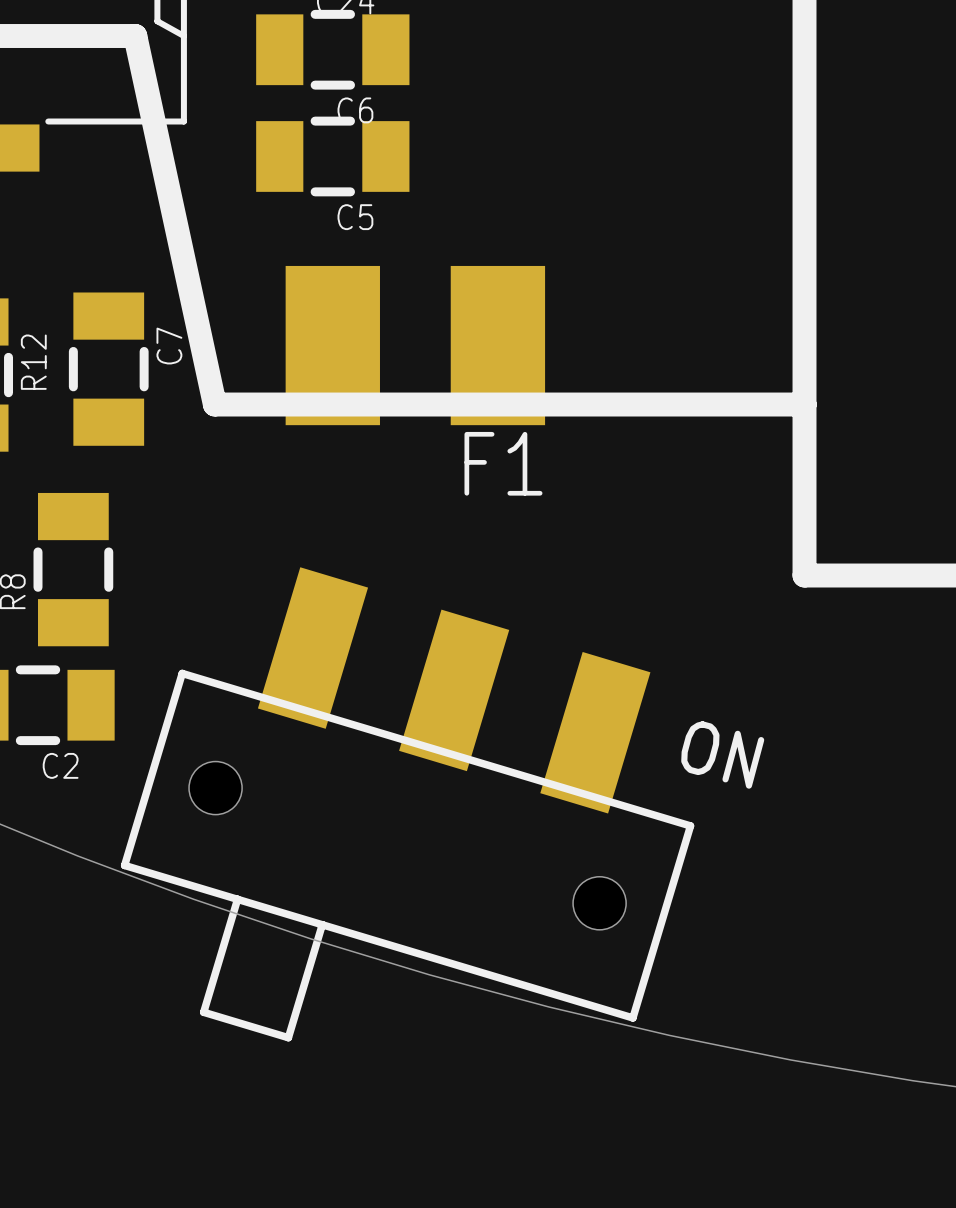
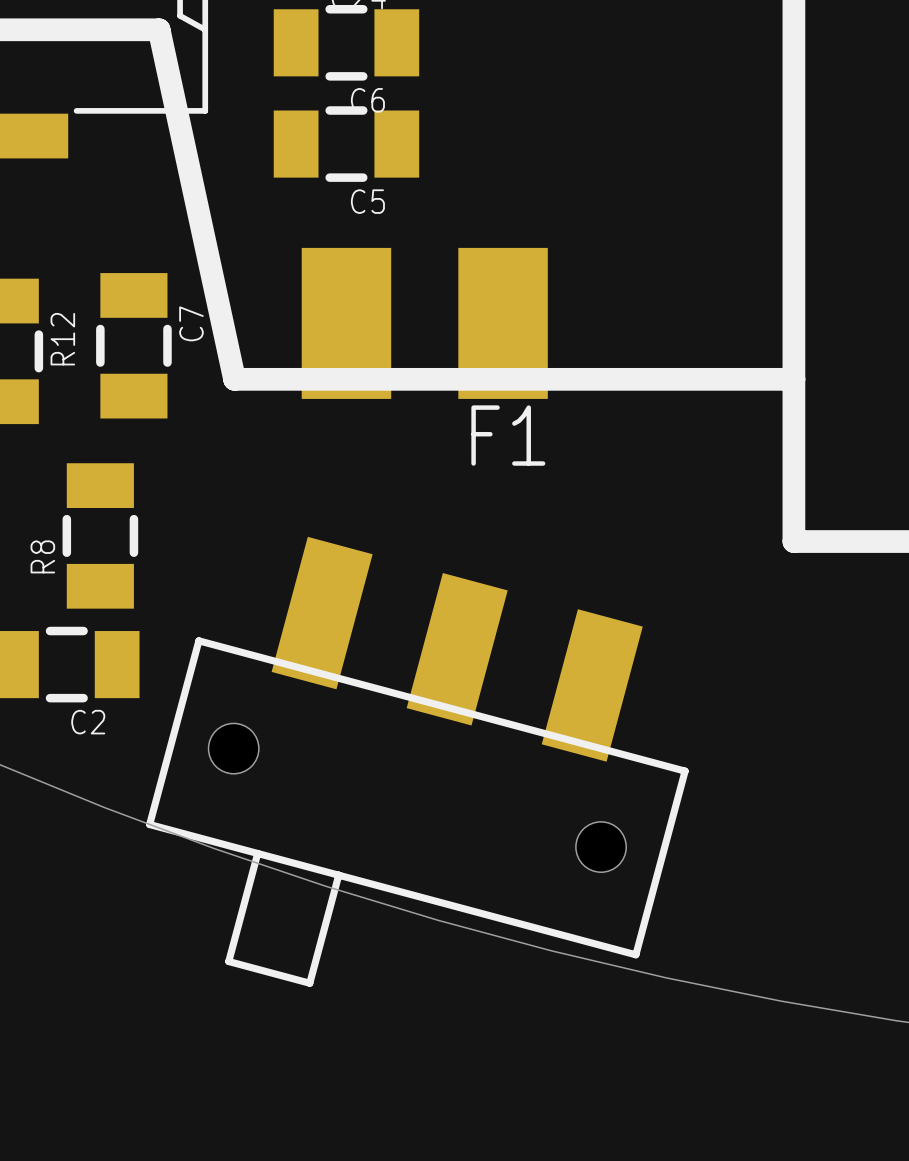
text: ON (722, 755) -> none
part rotation: 0° (407, 804) -> 1.7° counterclockwise (417, 761)

